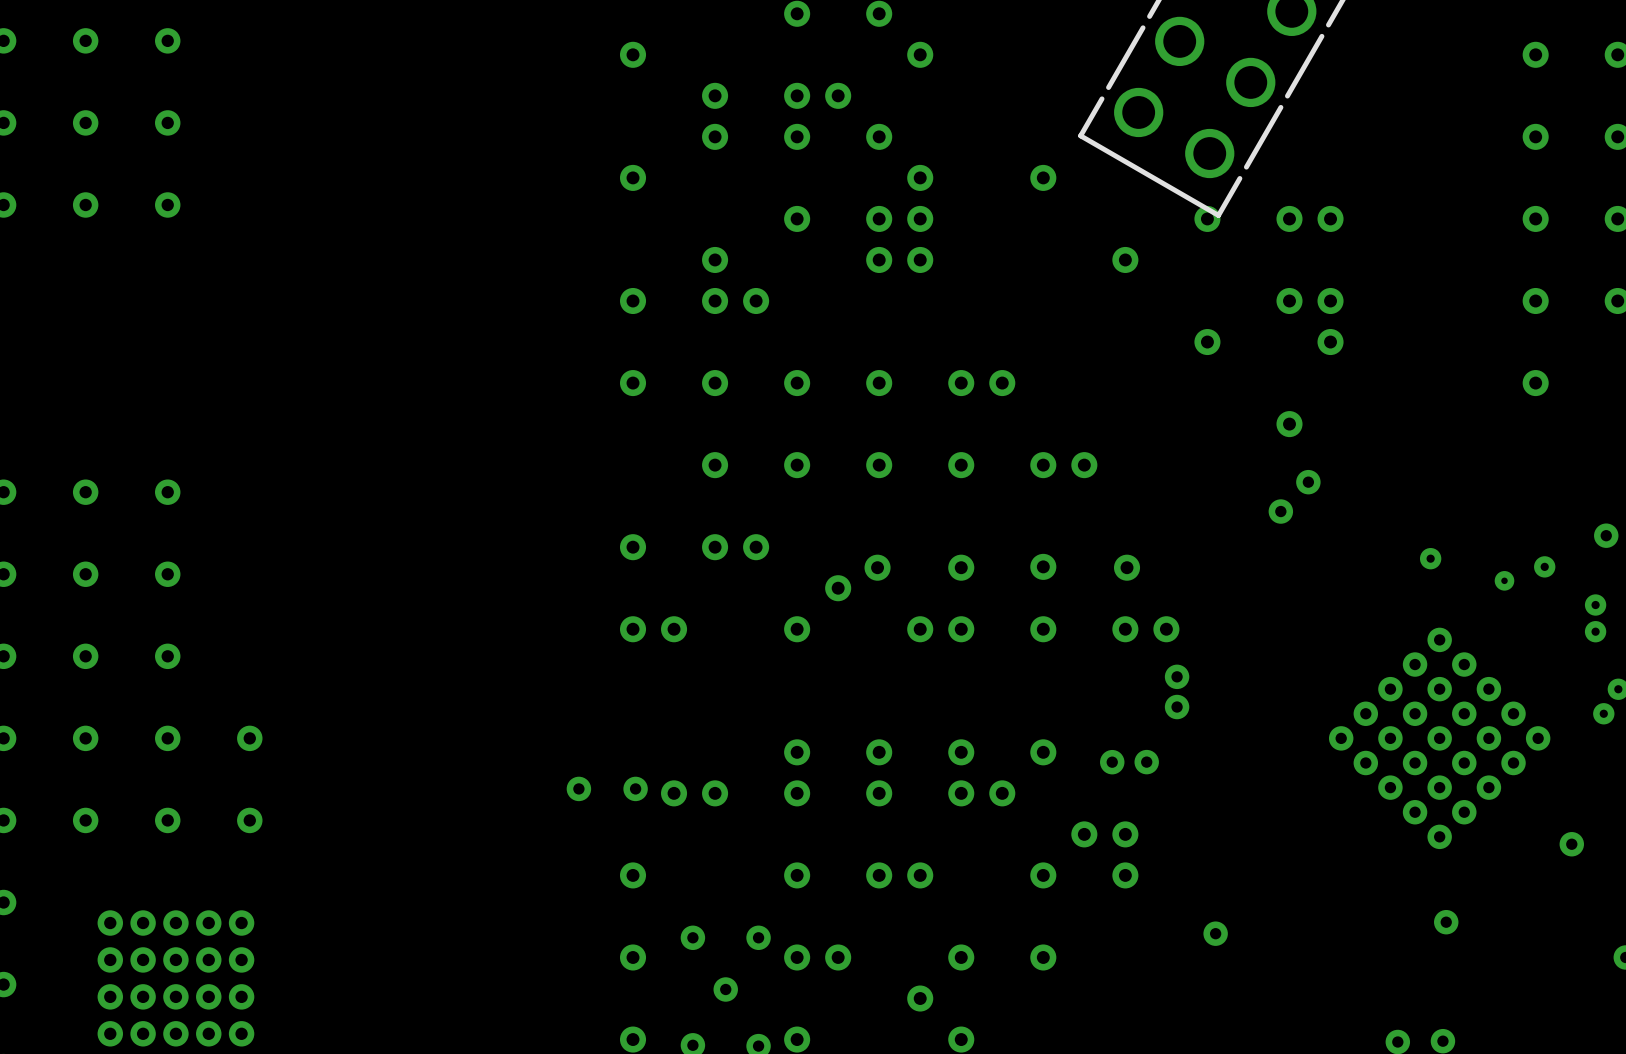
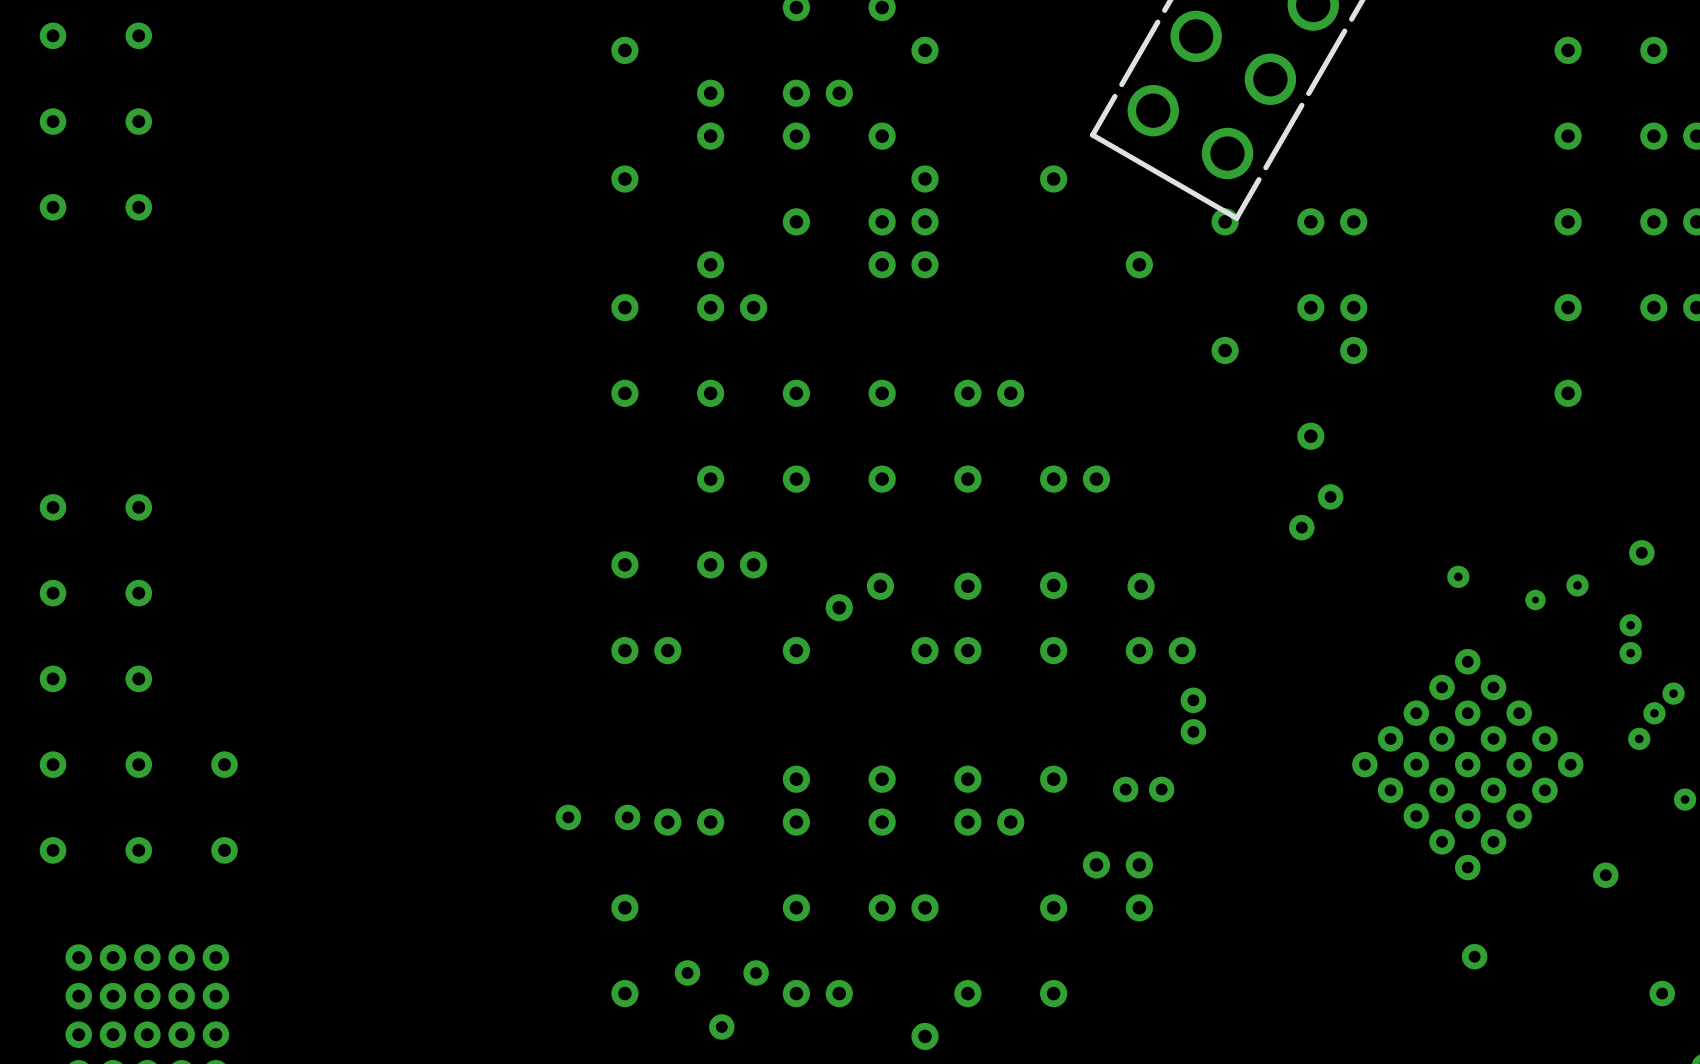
via: (1215, 933) -> none

